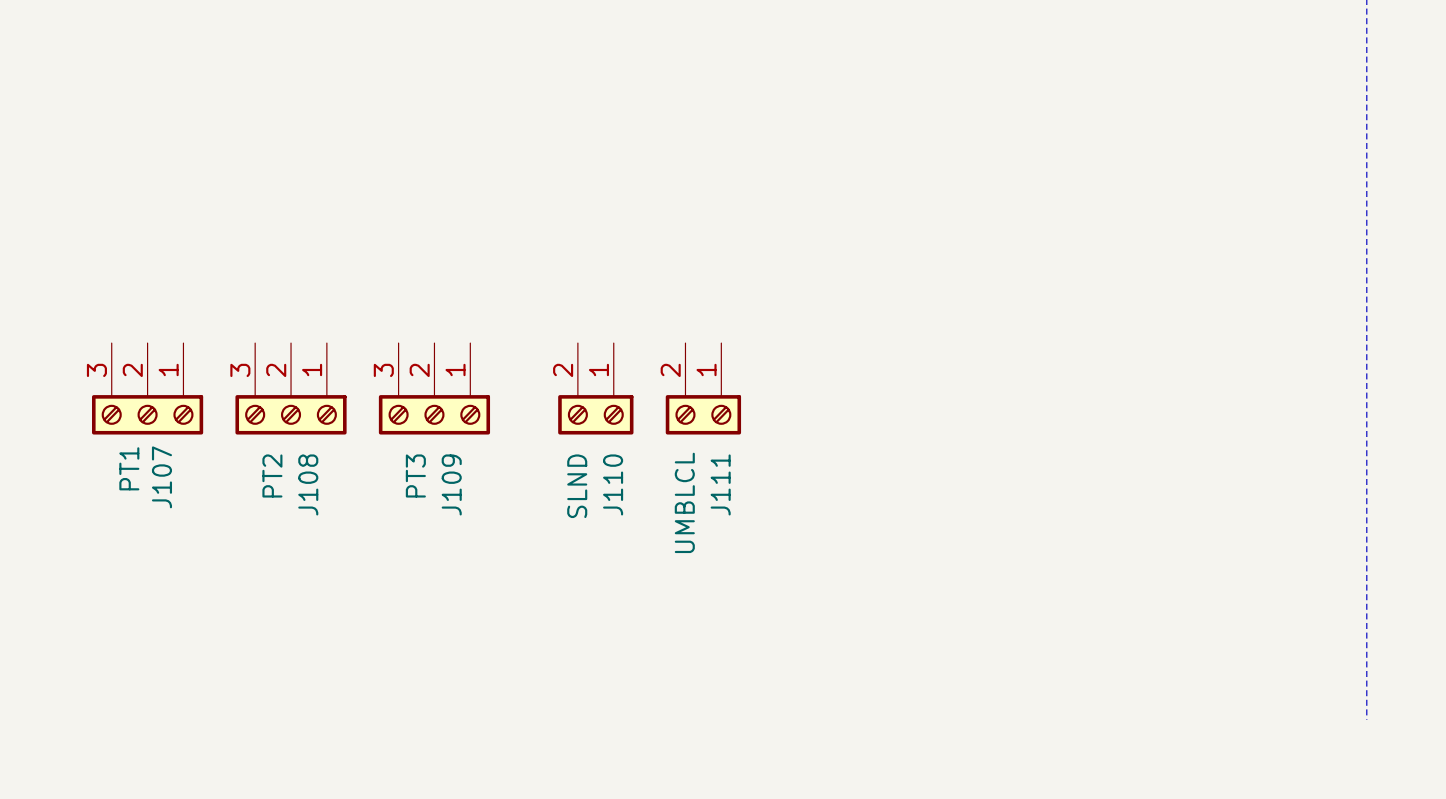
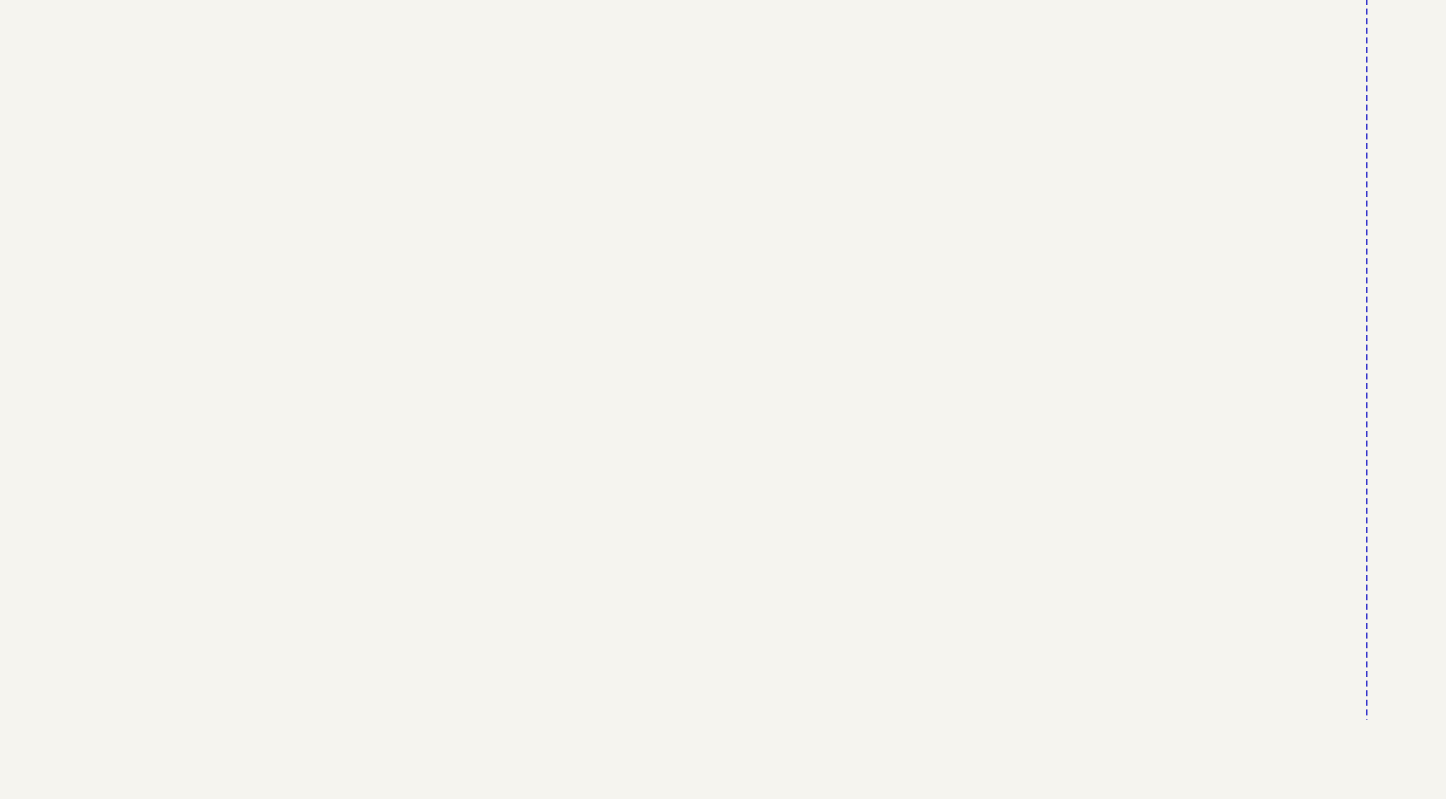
J107: PT1 (147, 388) -> none
J108: PT2 (291, 388) -> none
J109: PT3 (434, 388) -> none
J110: SLND (595, 388) -> none
J111: UMBLCL (703, 388) -> none

